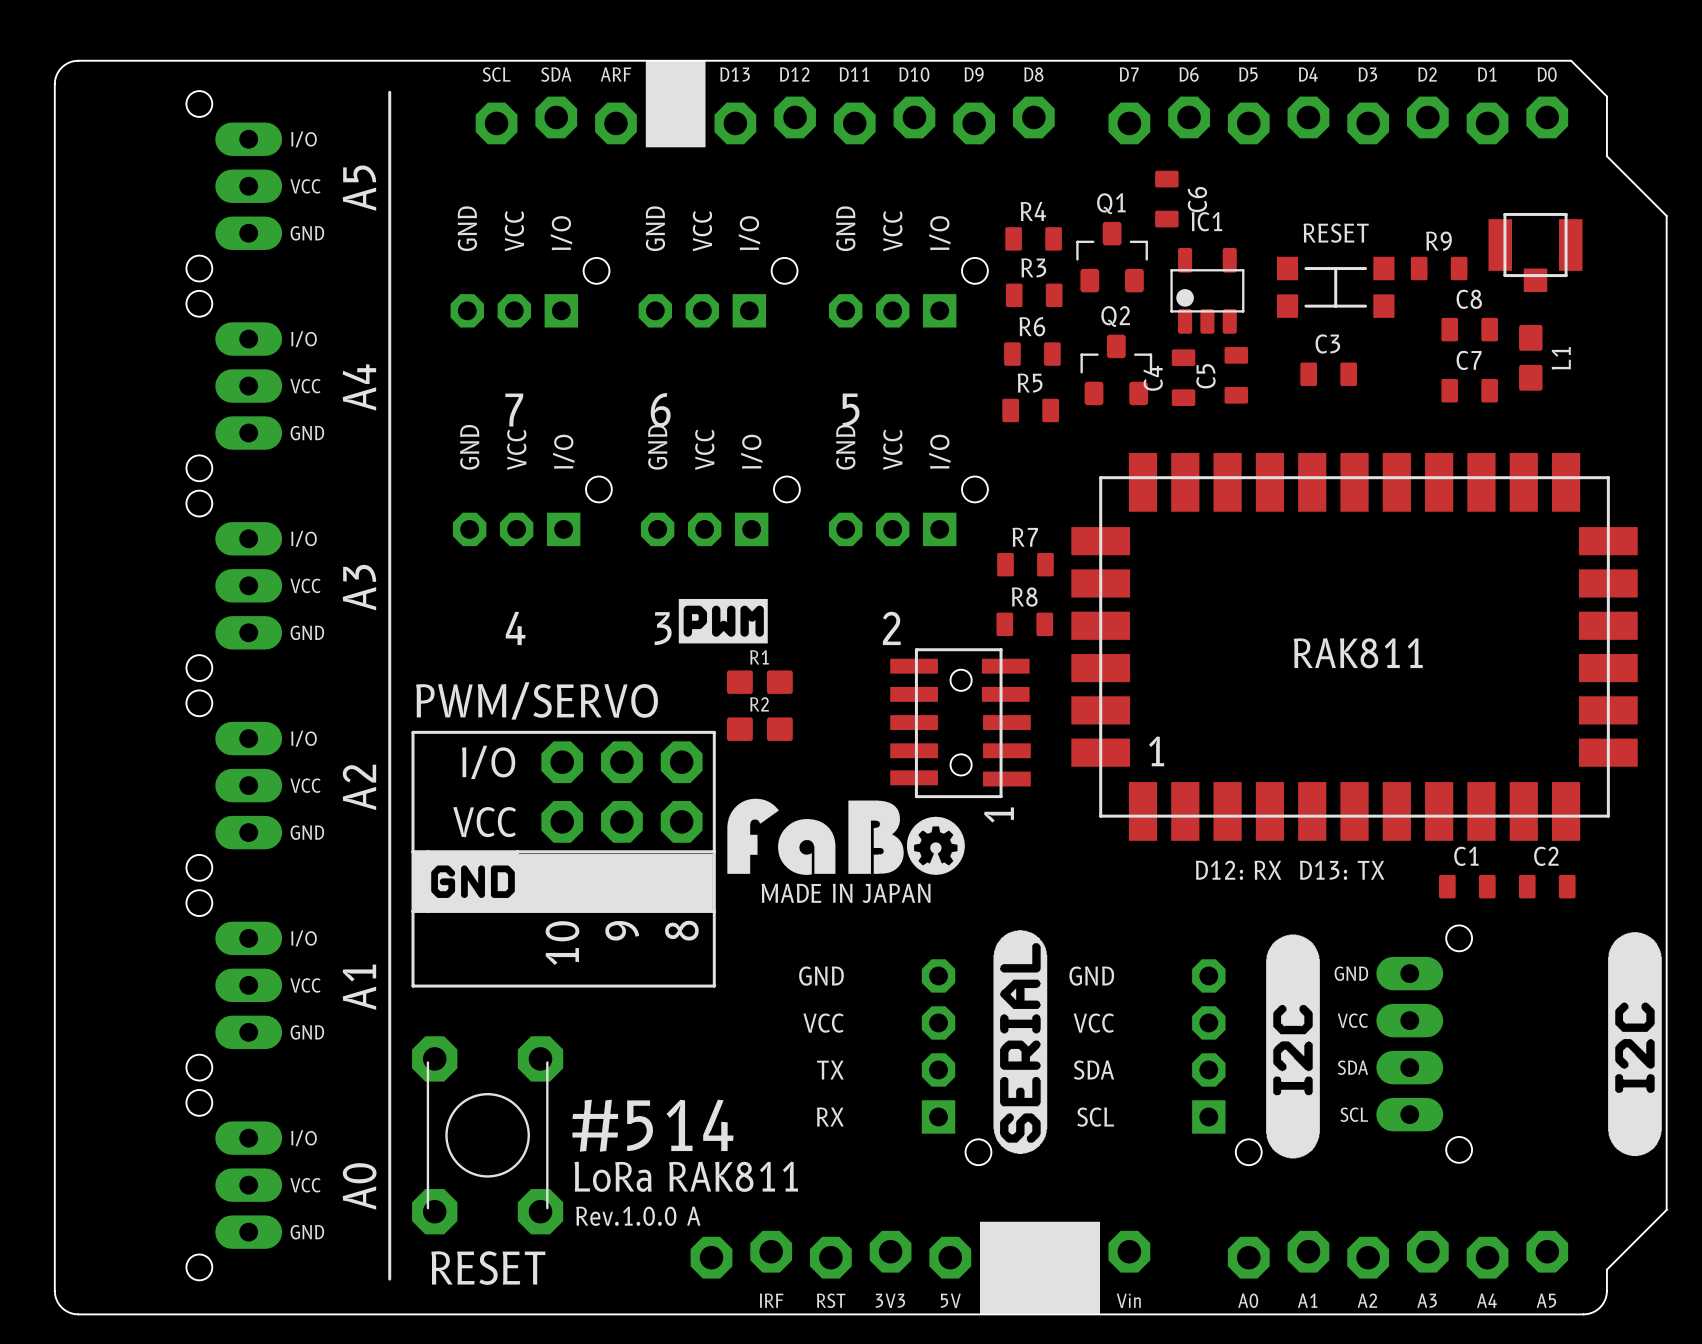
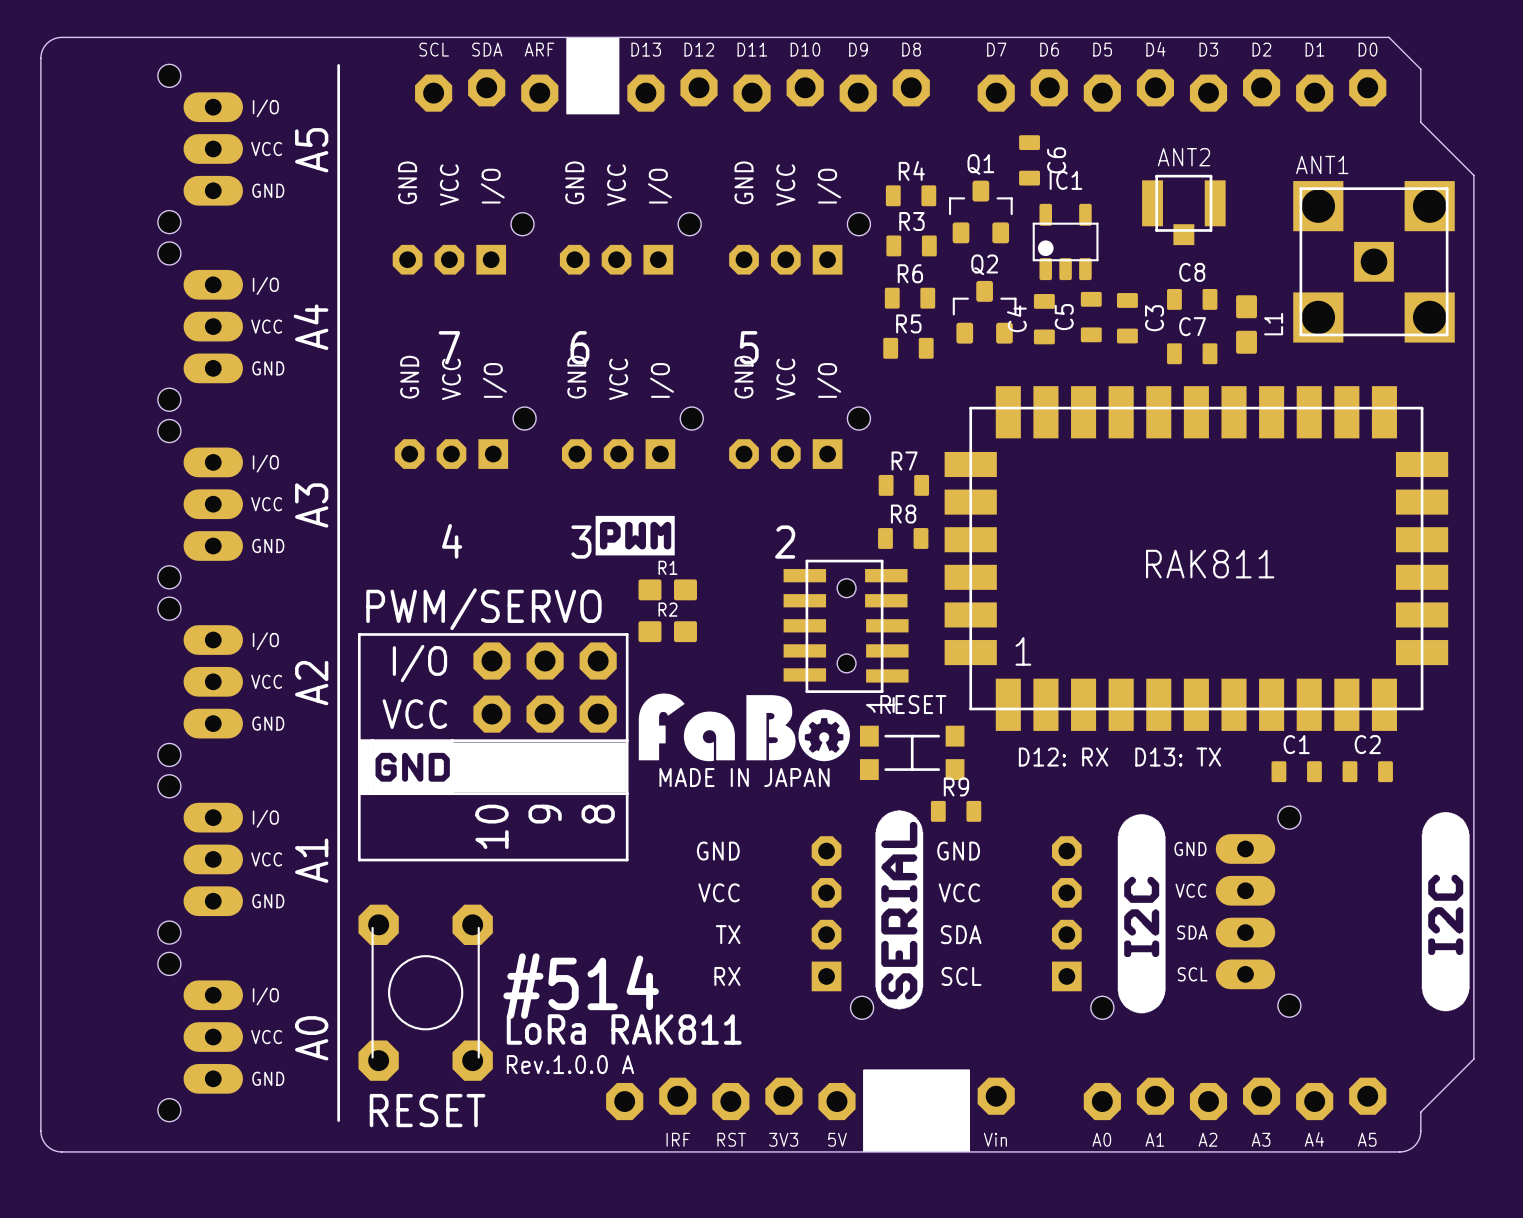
part: (1535, 252) -> none
ANT2: none -> (1183, 209)
R9 position: (1439, 268) -> (956, 811)
RESET: (1335, 287) -> none
ANT1: none -> (1374, 261)
C8 position: (1469, 329) -> (1192, 299)
L1 position: (1530, 357) -> (1246, 324)
C3 rotation: 0° (1328, 374) -> 90° clockwise (1127, 318)
C3 position: (1328, 374) -> (1127, 318)
C7 position: (1469, 390) -> (1192, 353)
RESET: none -> (912, 752)

